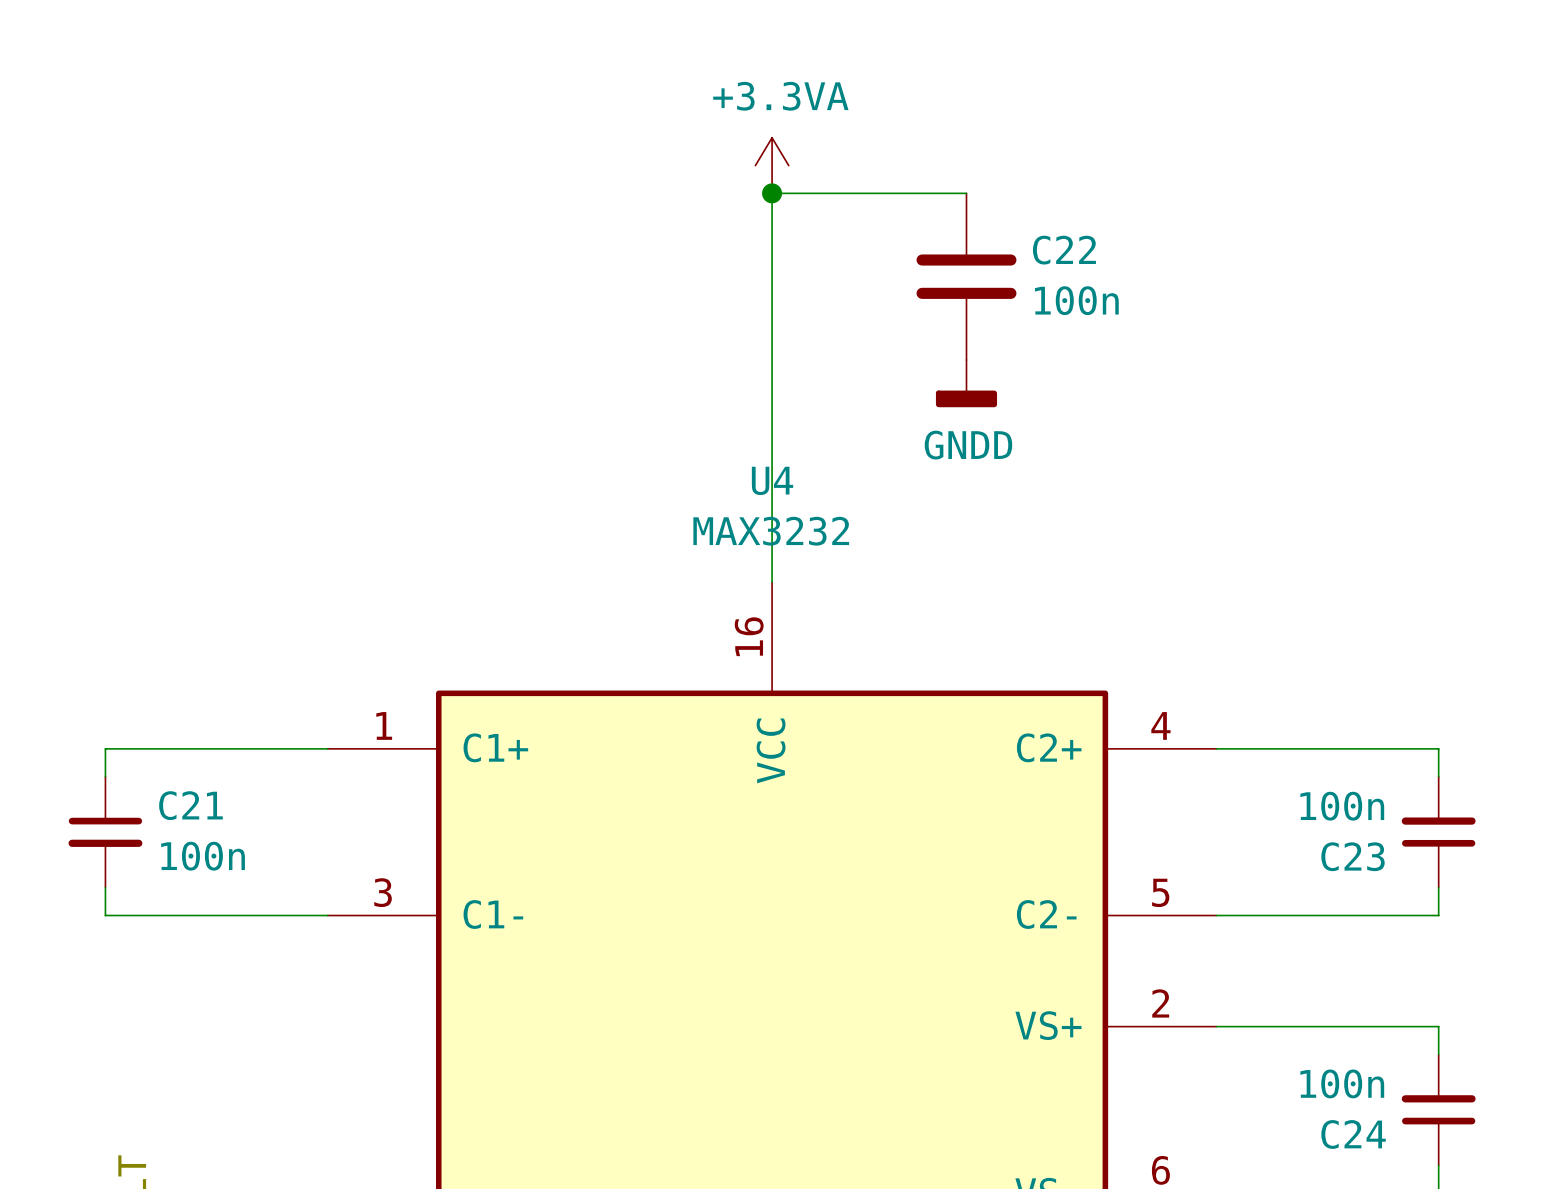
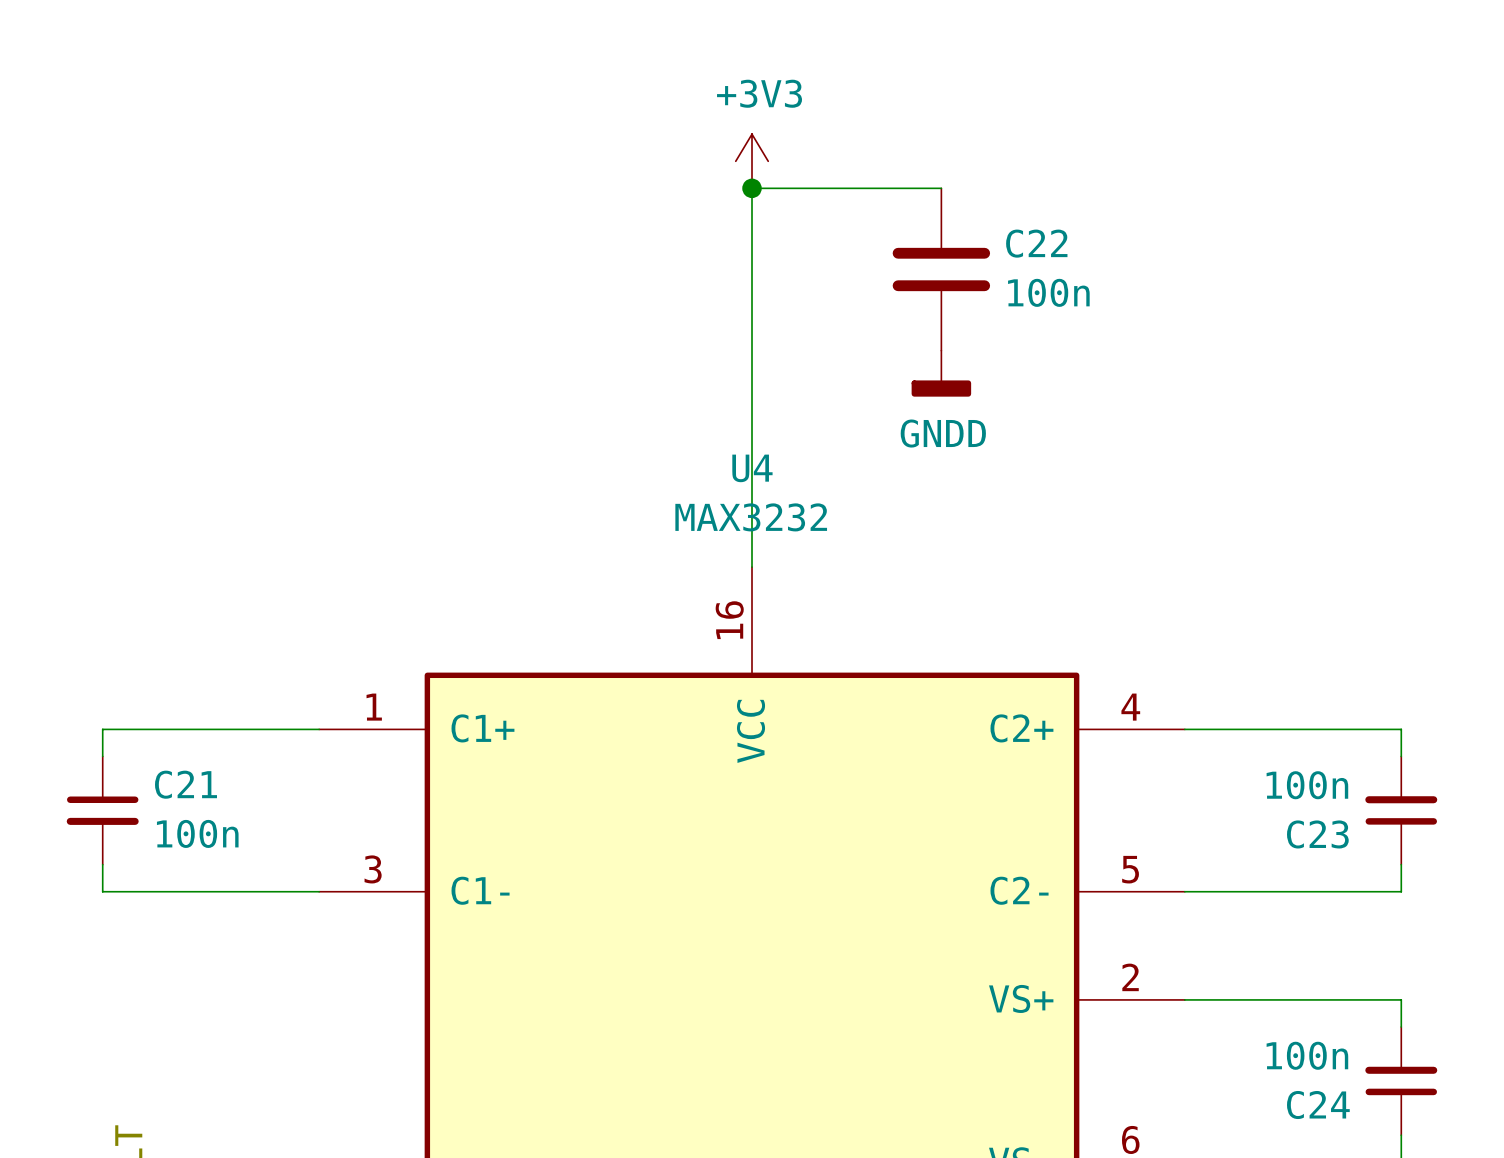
power symbol: +3.3VA (772, 165) -> +3V3 (752, 161)

